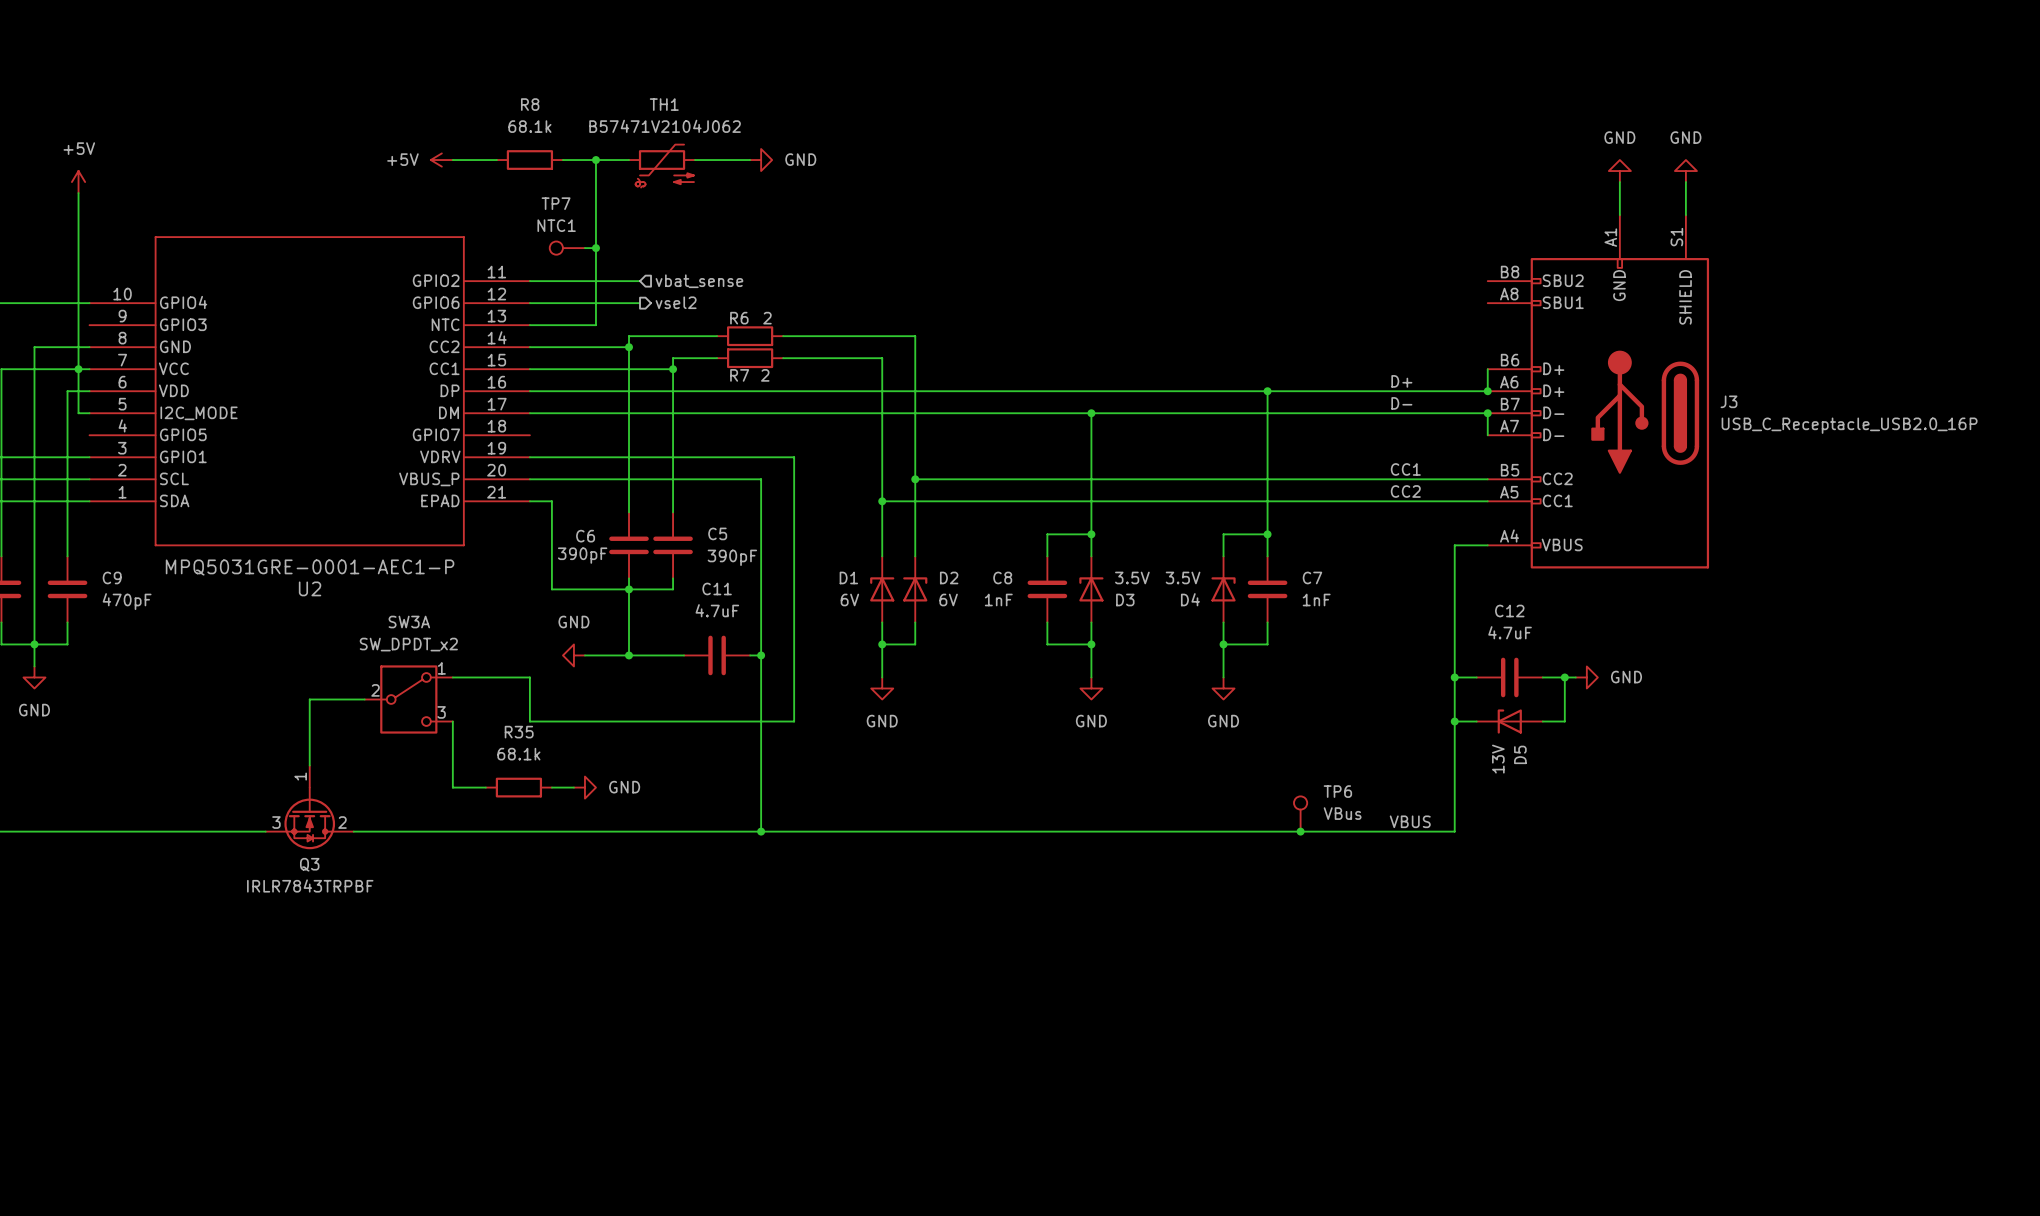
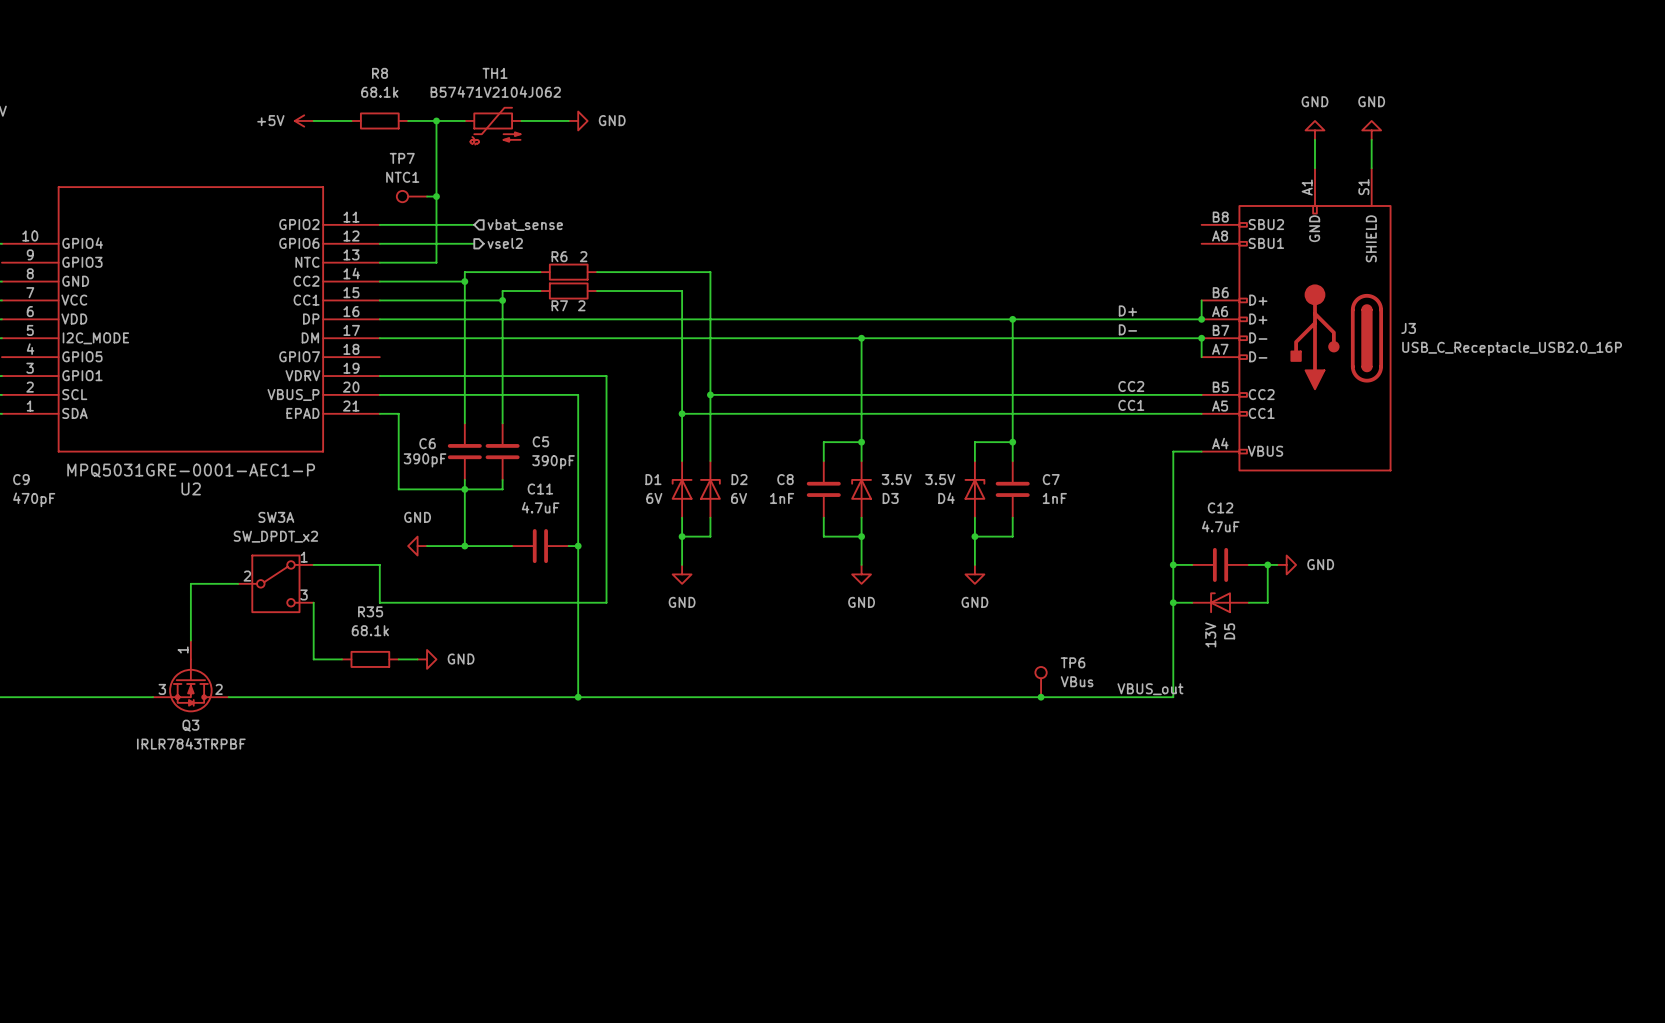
label: CC1 (1405, 469) -> CC2 (1131, 386)
label: CC2 (1405, 491) -> CC1 (1131, 405)
label: VBUS (1410, 821) -> VBUS_out (1150, 689)

